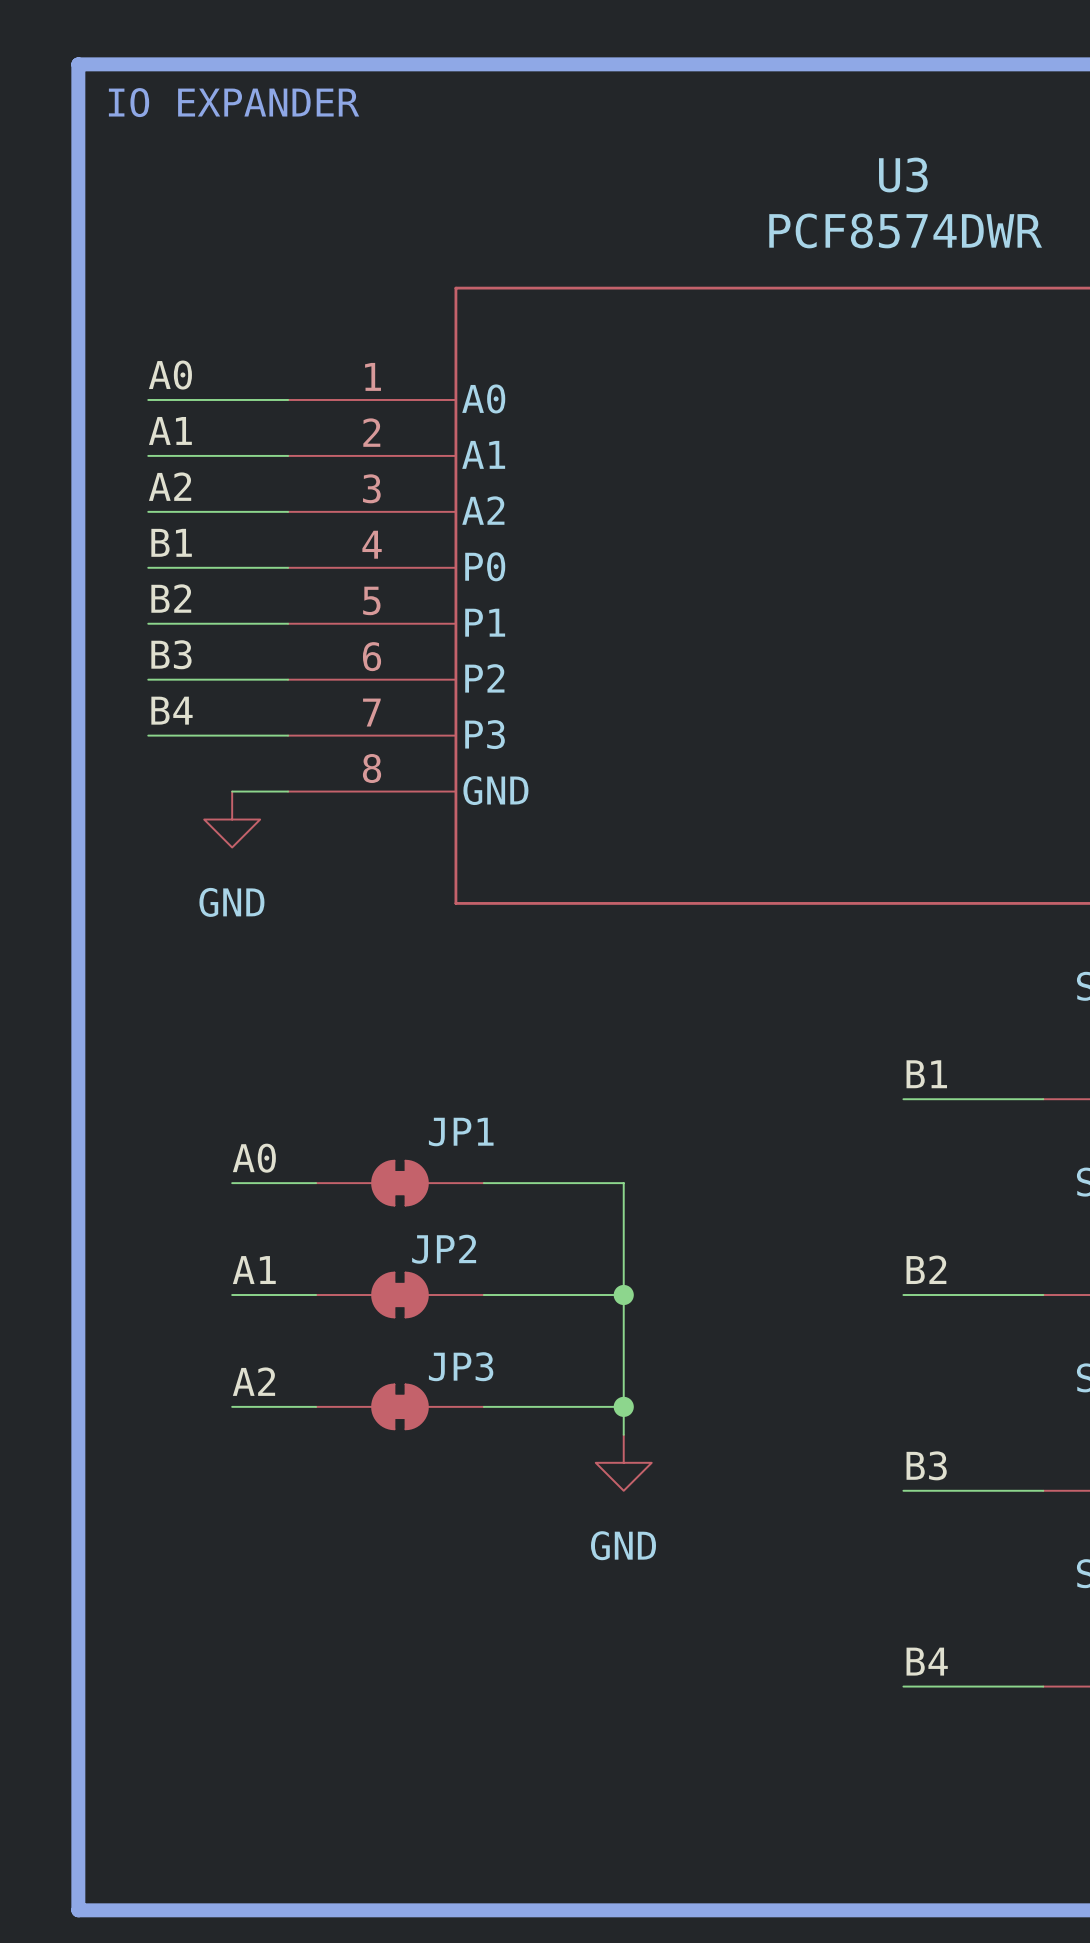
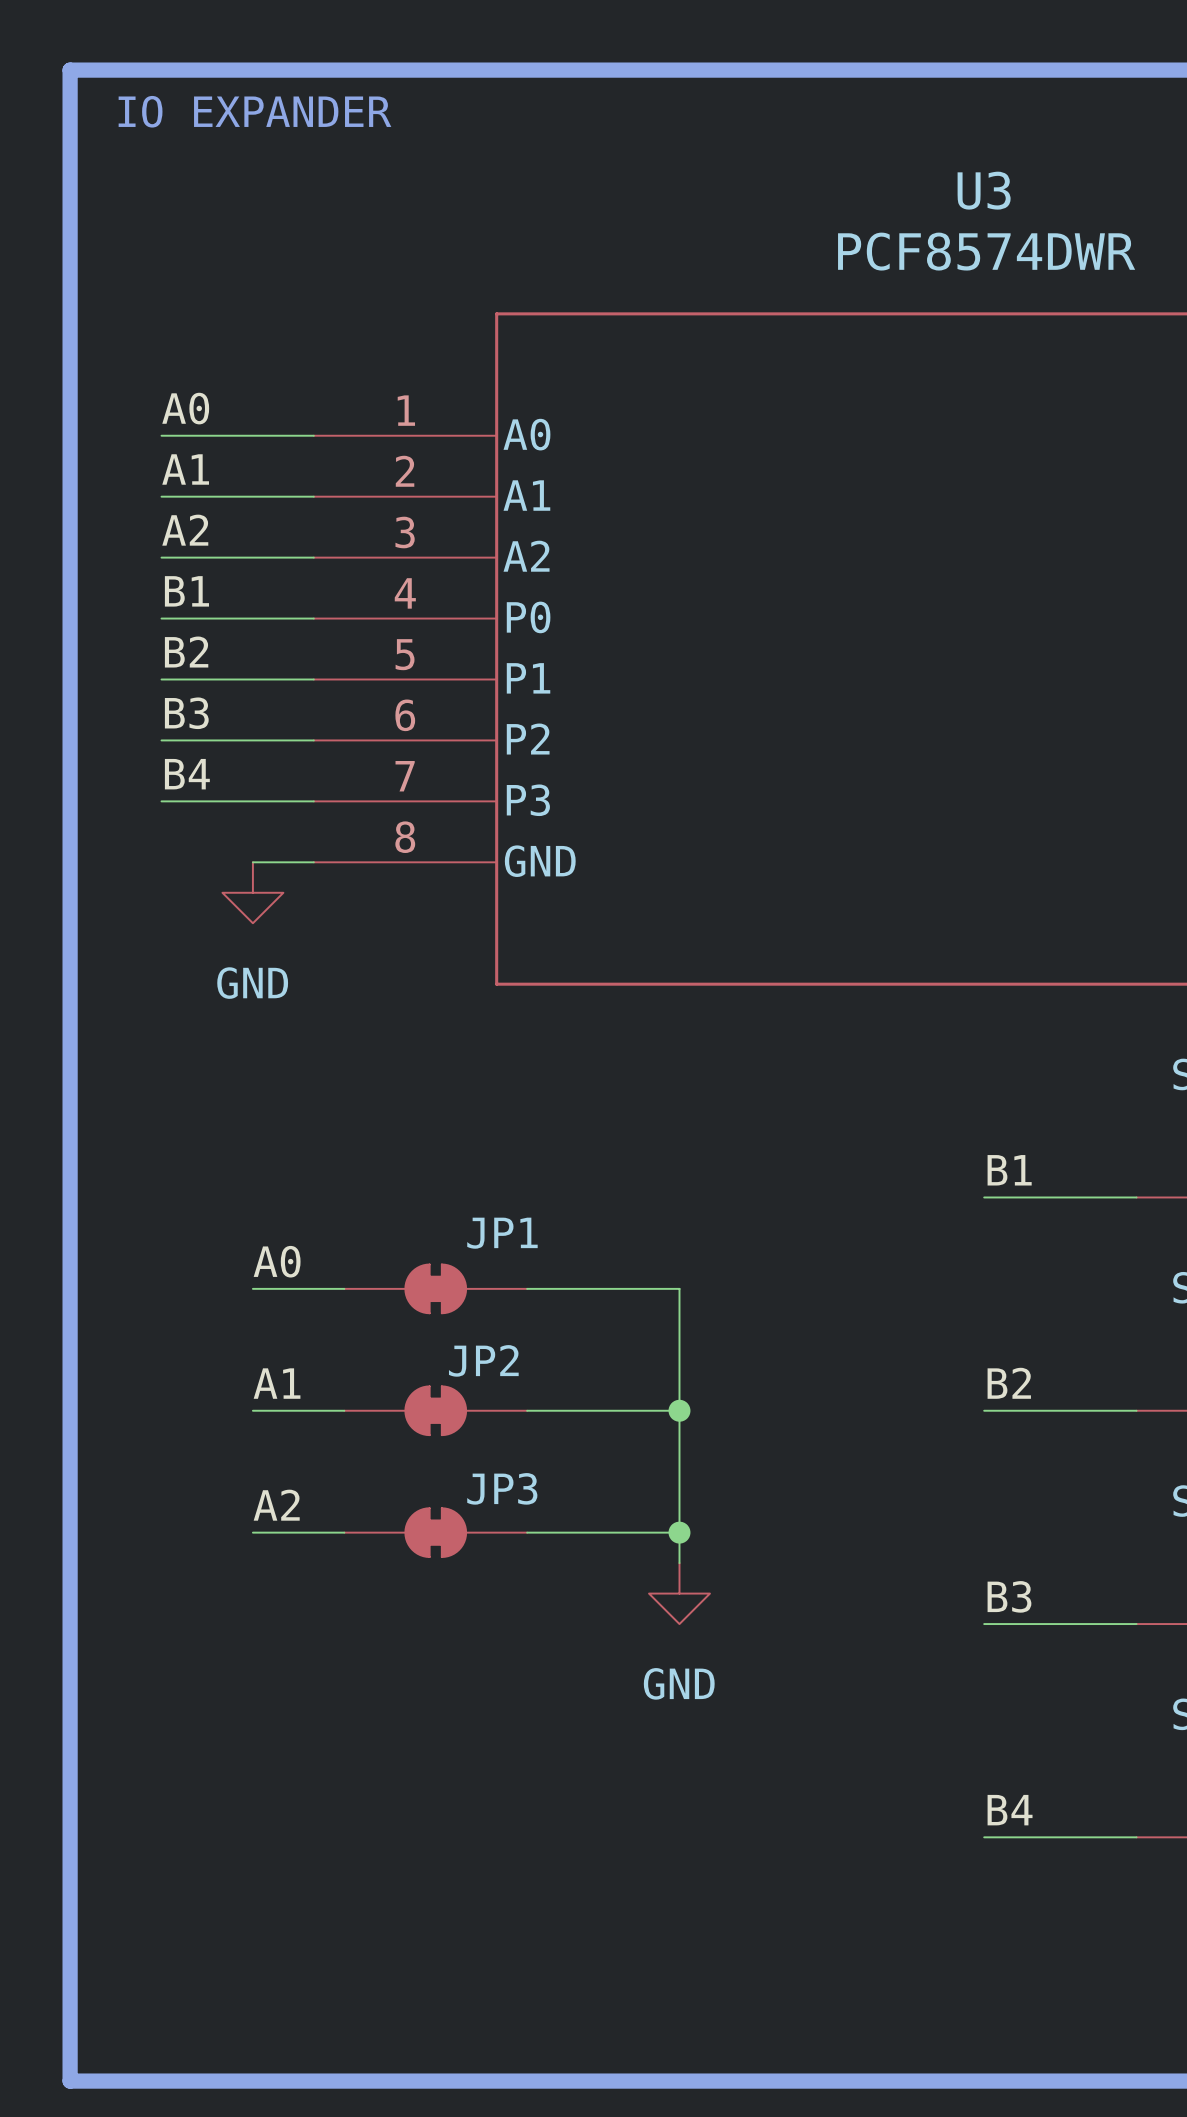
line: (78, 64) (78, 1910) -> (85, 70) (70, 70) (70, 2081) (85, 2081)

